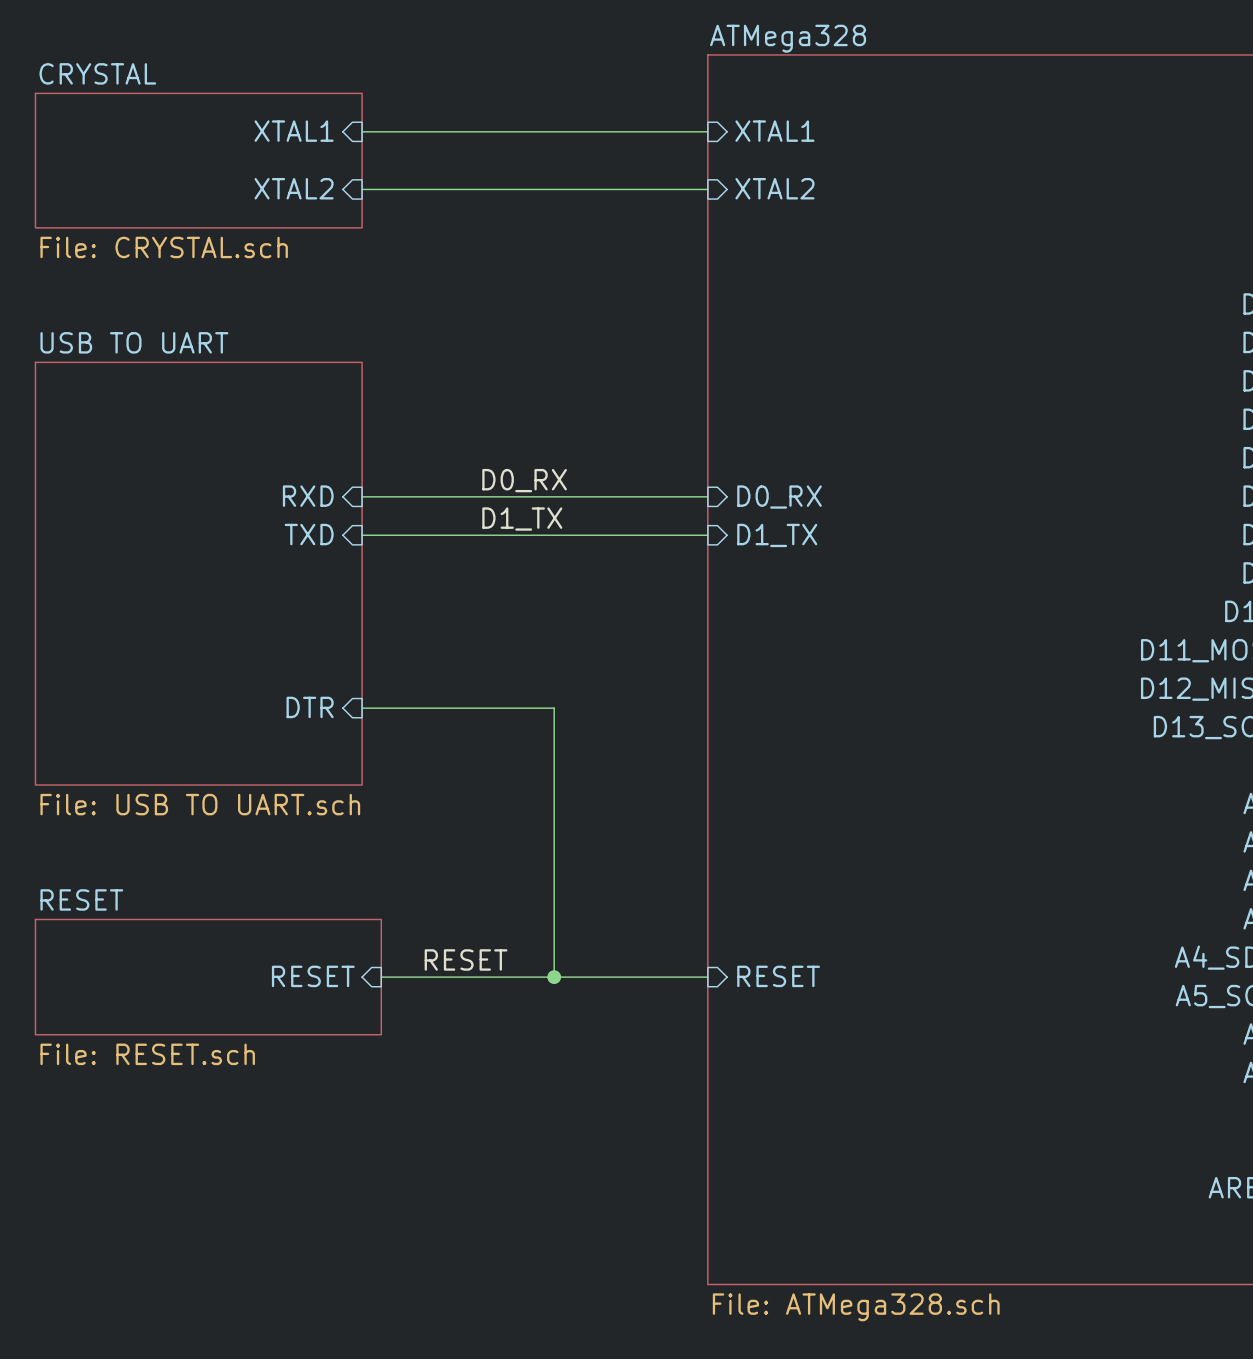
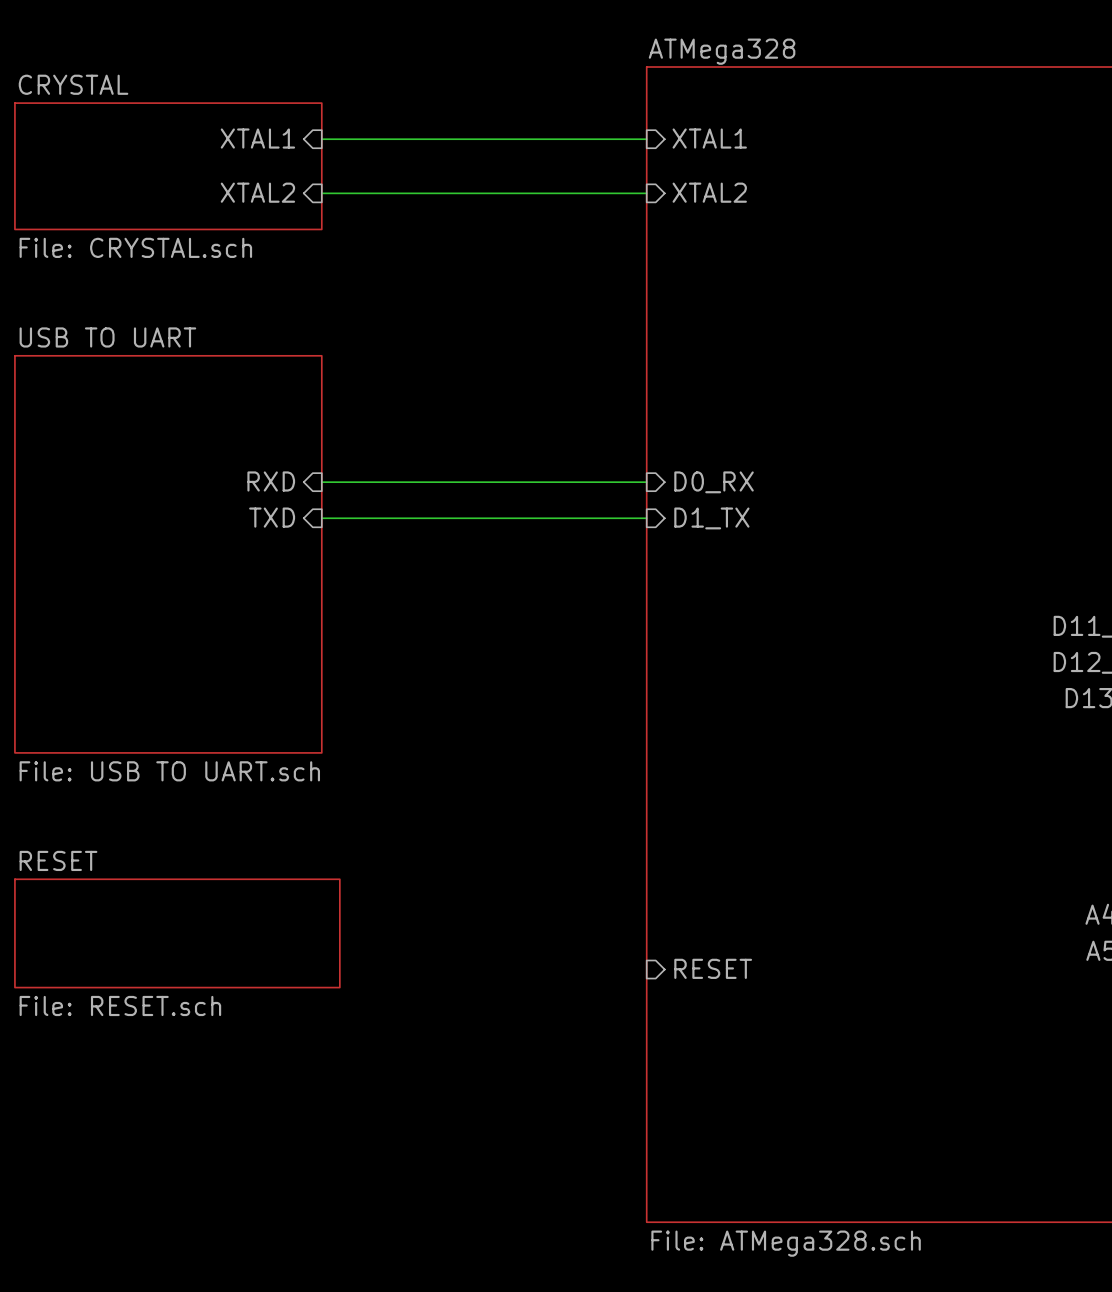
label: D0_RX (524, 480) -> none
label: D1_TX (522, 519) -> none
sheet pin: DTR (310, 707) -> none
wire: (362, 708) (554, 708) (554, 977) -> none
label: RESET (466, 959) -> none
sheet pin: RESET (313, 976) -> none
sheet pin position: RESET (778, 976) -> RESET (713, 968)
wire: (381, 977) (707, 977) -> none
junction: (554, 977) -> none

